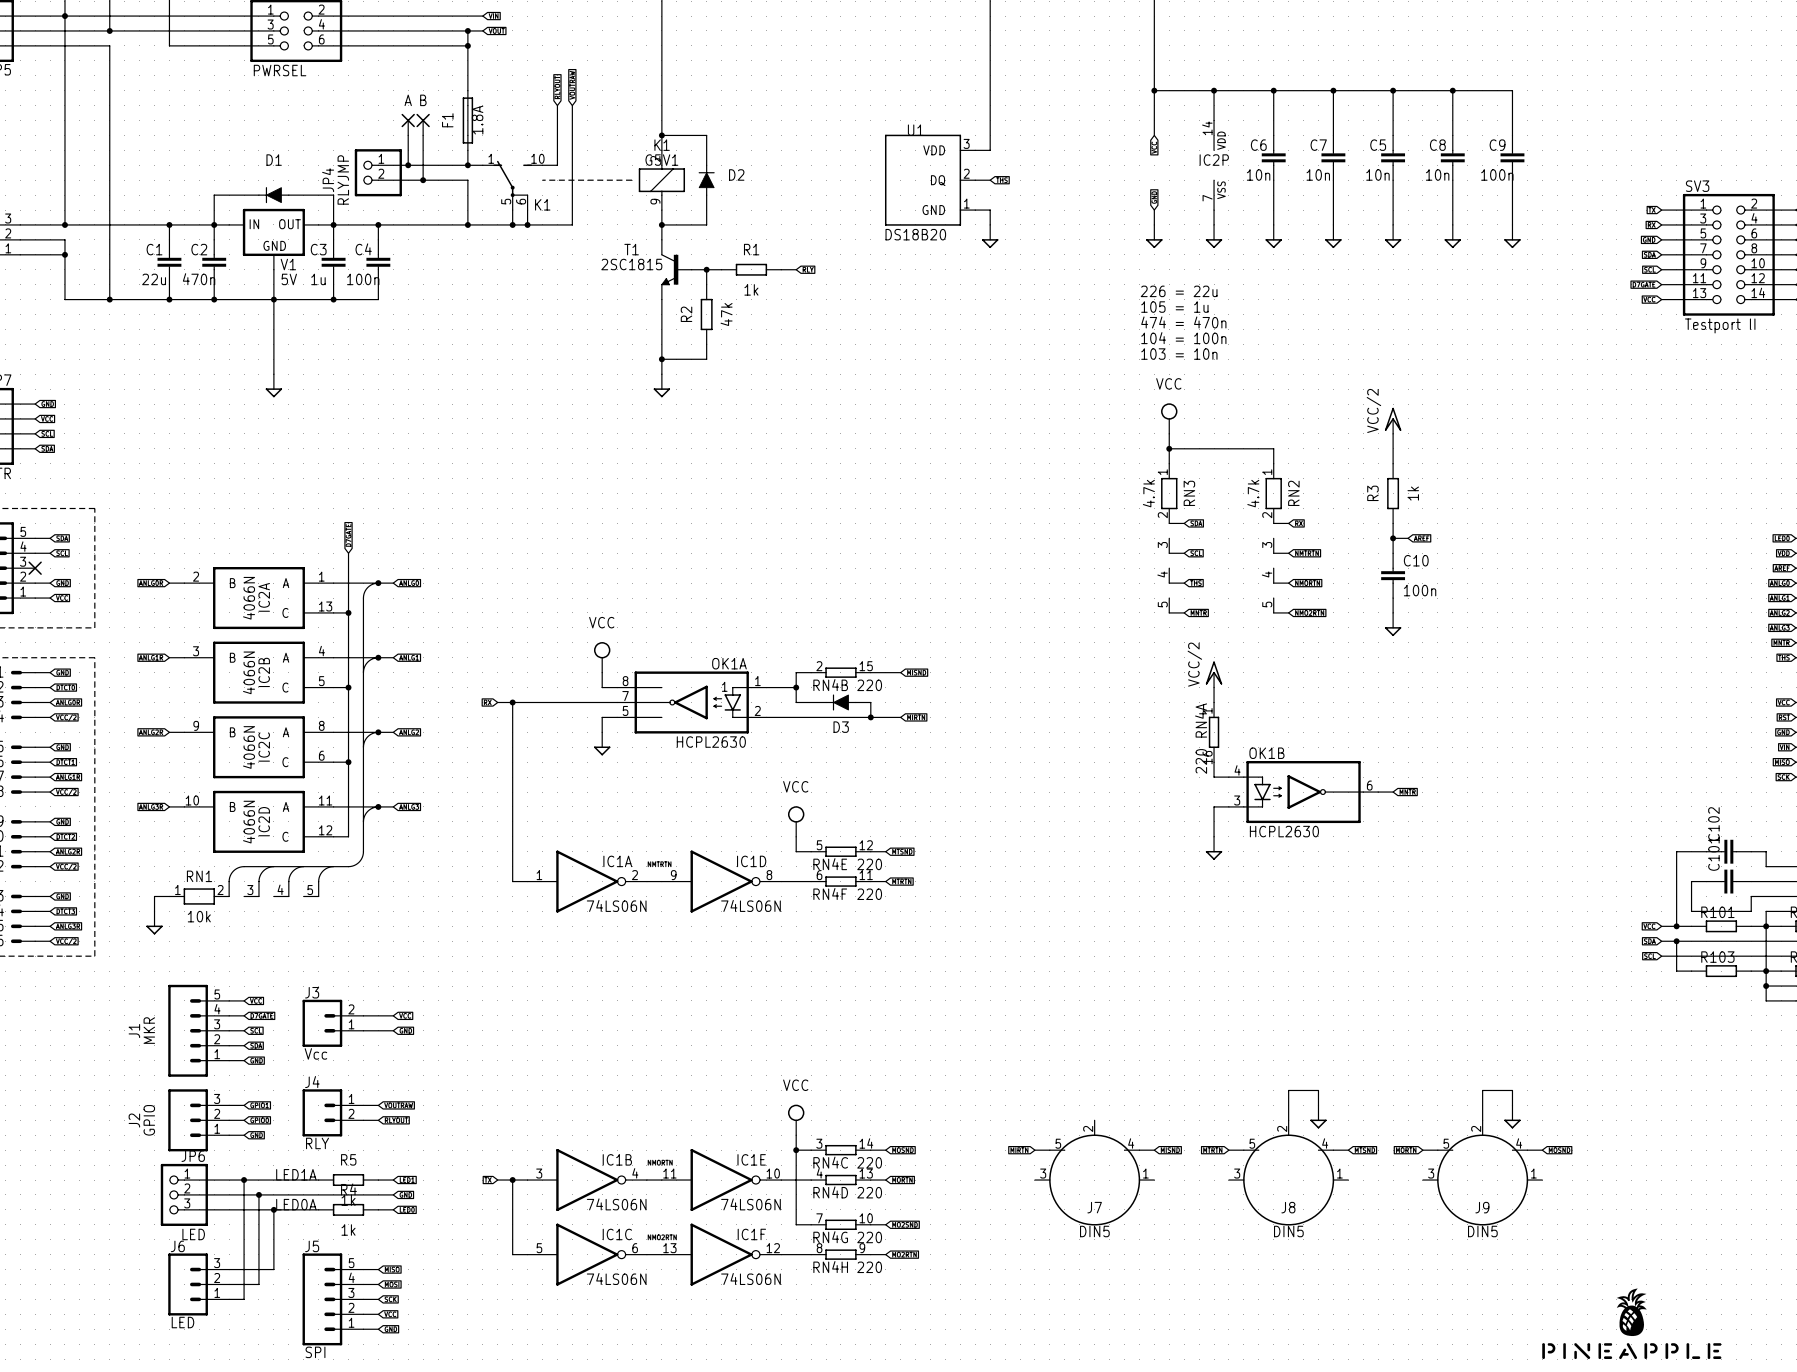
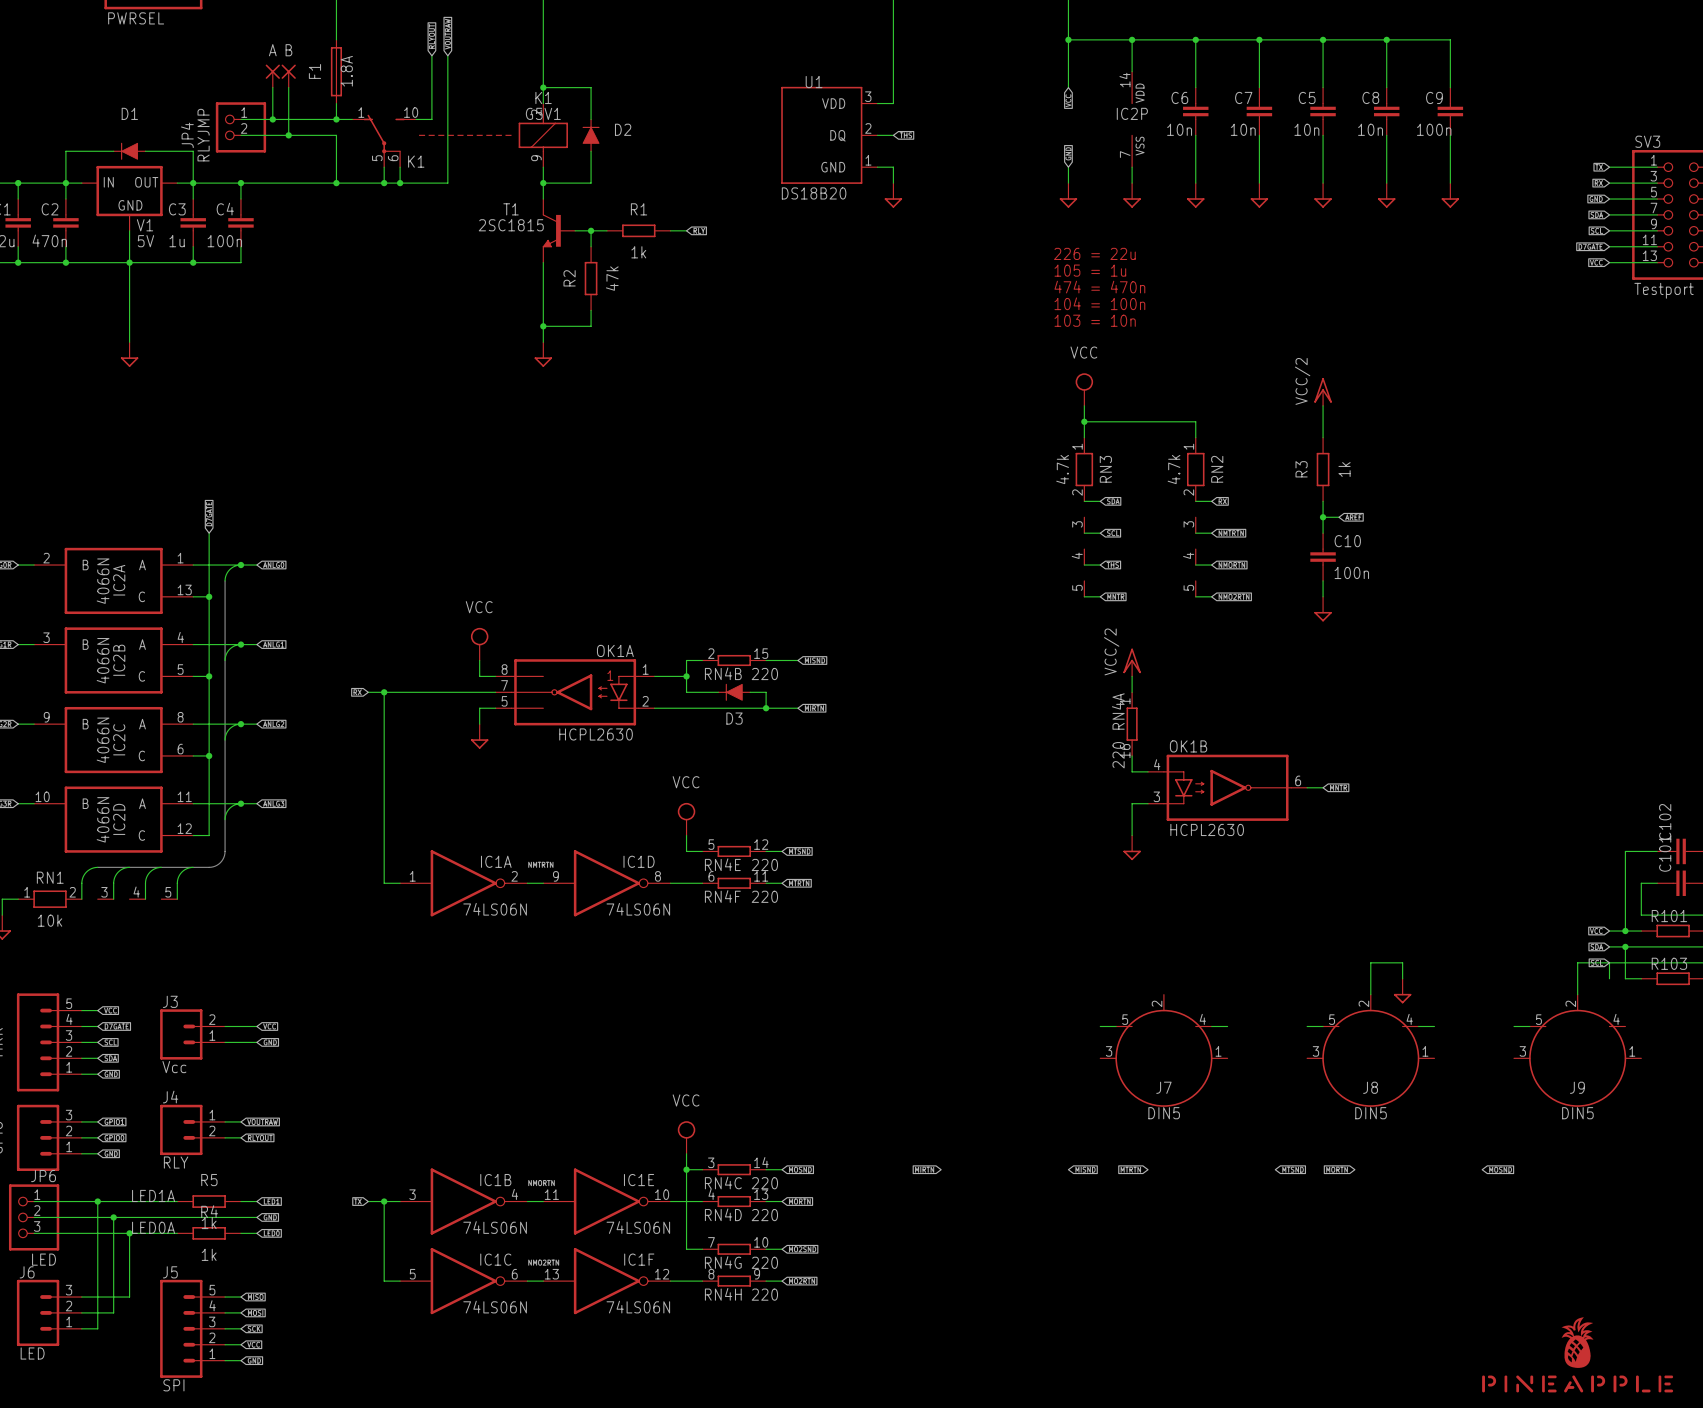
wire: none -> (1609, 978) (1609, 962) (1577, 962) (1577, 994)
power symbol: none -> (1402, 991)
wire: none -> (1514, 1026) (1529, 1026)
wire: (1318, 1105) (1318, 1090) (1288, 1090) (1288, 1120) -> none
wire: (1512, 1105) (1512, 1090) (1482, 1090) (1482, 1120) -> (1402, 978) (1402, 962) (1370, 962) (1370, 994)
power symbol: (1318, 1116) -> none
power symbol: (1512, 1116) -> none
wire: (1034, 1150) (1049, 1150) -> none
wire: (1139, 1150) (1154, 1150) -> none
wire: (1228, 1150) (1243, 1150) -> (1100, 1026) (1116, 1026)
wire: (1333, 1150) (1348, 1150) -> (1211, 1026) (1227, 1026)
wire: (1422, 1150) (1437, 1150) -> (1307, 1026) (1323, 1026)
wire: (1527, 1150) (1542, 1150) -> (1418, 1026) (1434, 1026)
J7 position: (1094, 1172) -> (1163, 1050)
J8 position: (1288, 1172) -> (1370, 1050)
J9 position: (1482, 1172) -> (1577, 1050)

